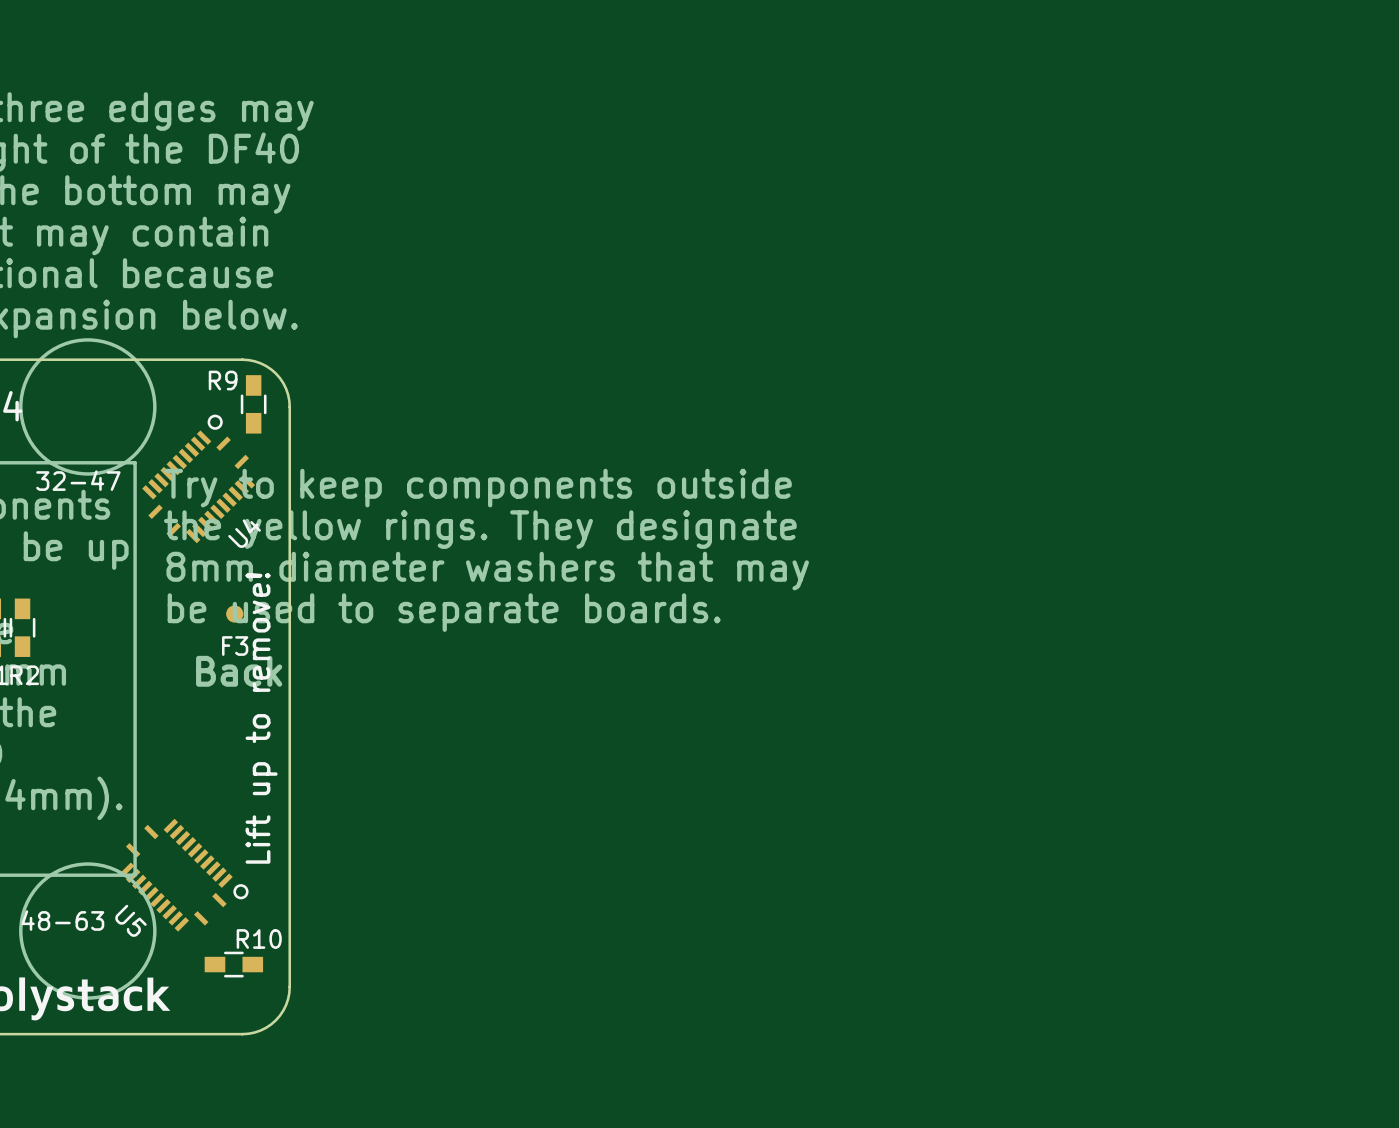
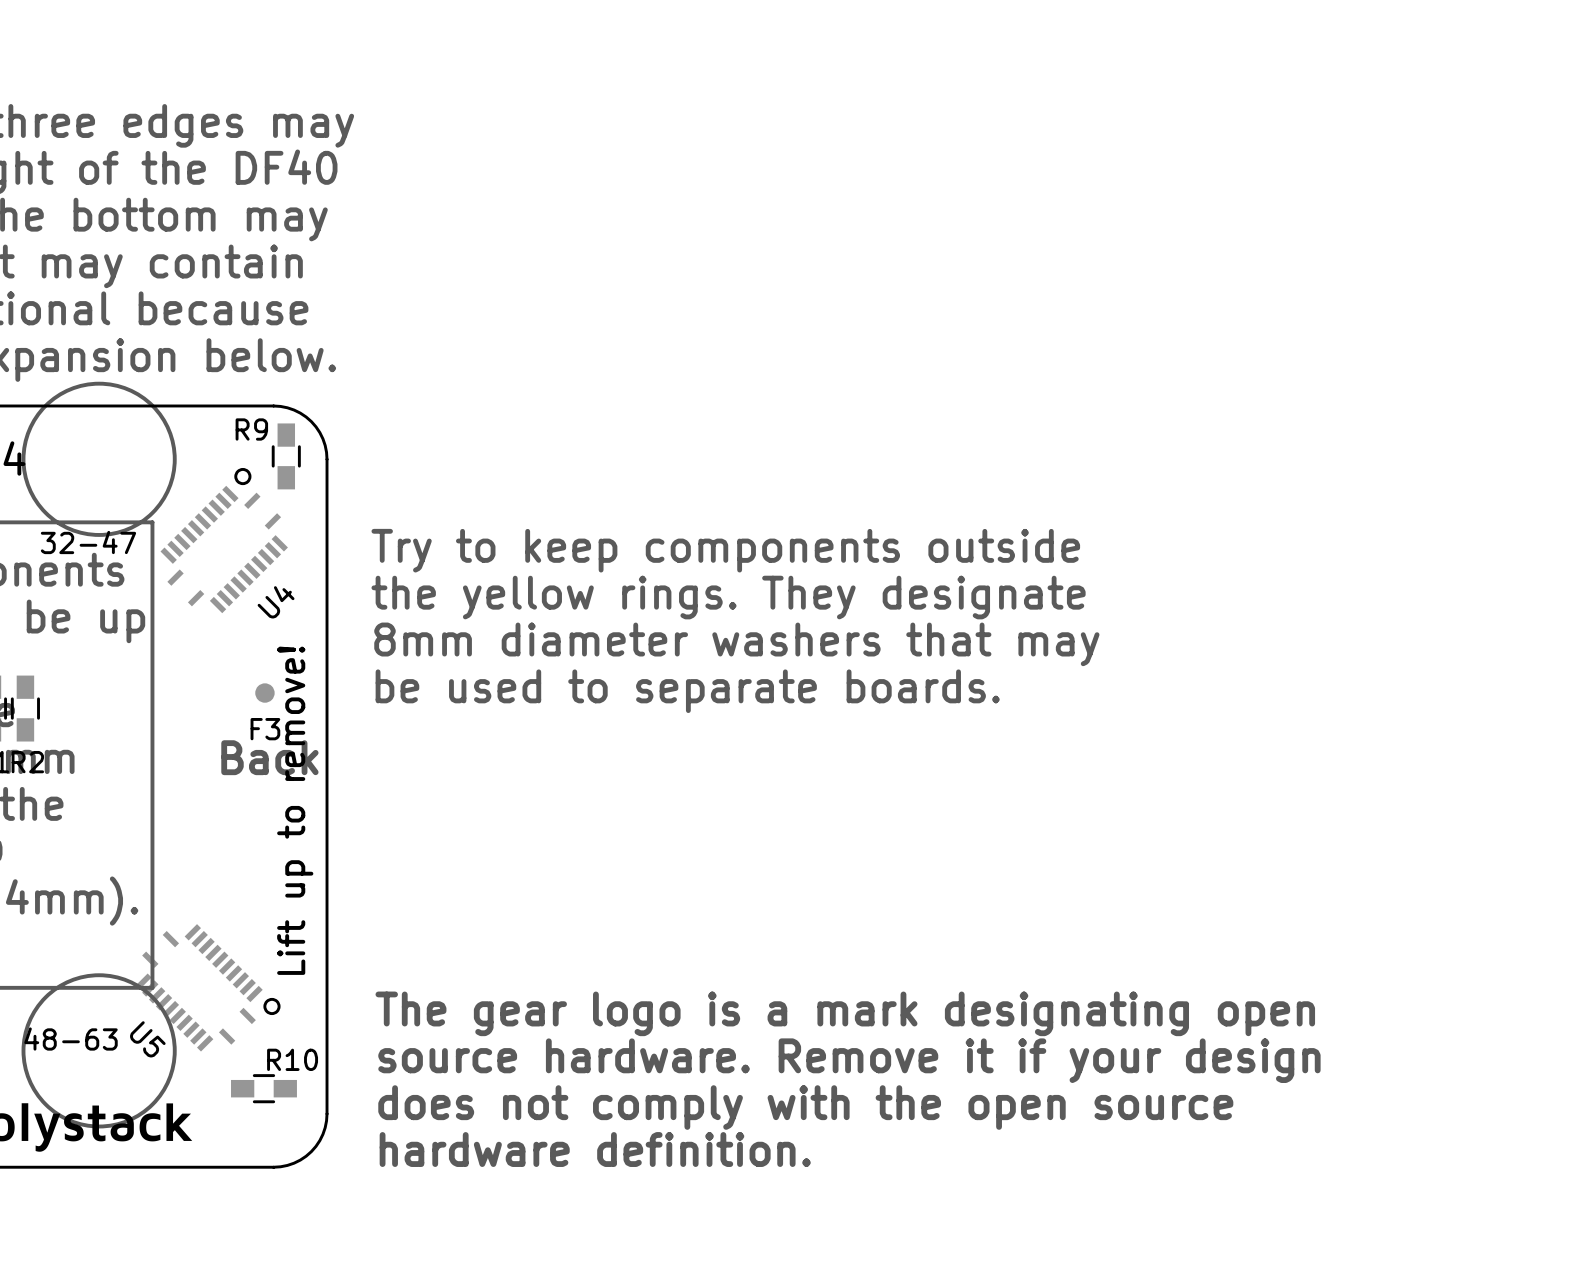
text position: Try to keep components outside (477, 488) -> Try to keep components outside (725, 550)
text position: the yellow rings. They designate (480, 529) -> the yellow rings. They designate (728, 597)
text position: 8mm diameter washers that may (487, 571) -> 8mm diameter washers that may (736, 644)
text position: be used to separate boards. (444, 612) -> be used to separate boards. (687, 691)
text: none -> The gear logo is a mark designating open (845, 1013)
text: none -> source hardware. Remove it if your design (849, 1060)
text: none -> does not comply with the open source (805, 1107)
text: none -> hardware definition. (595, 1149)

